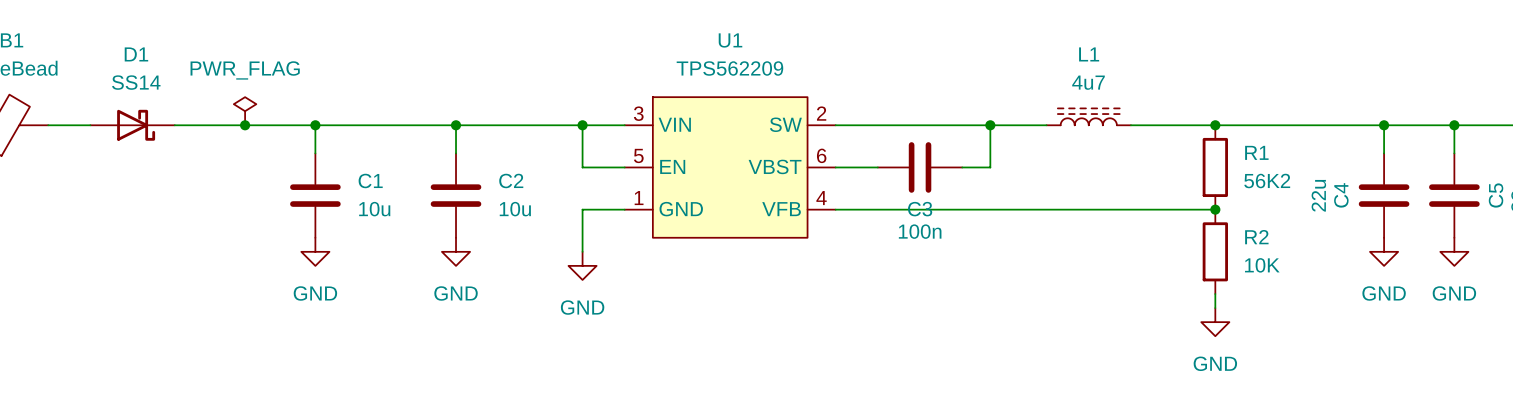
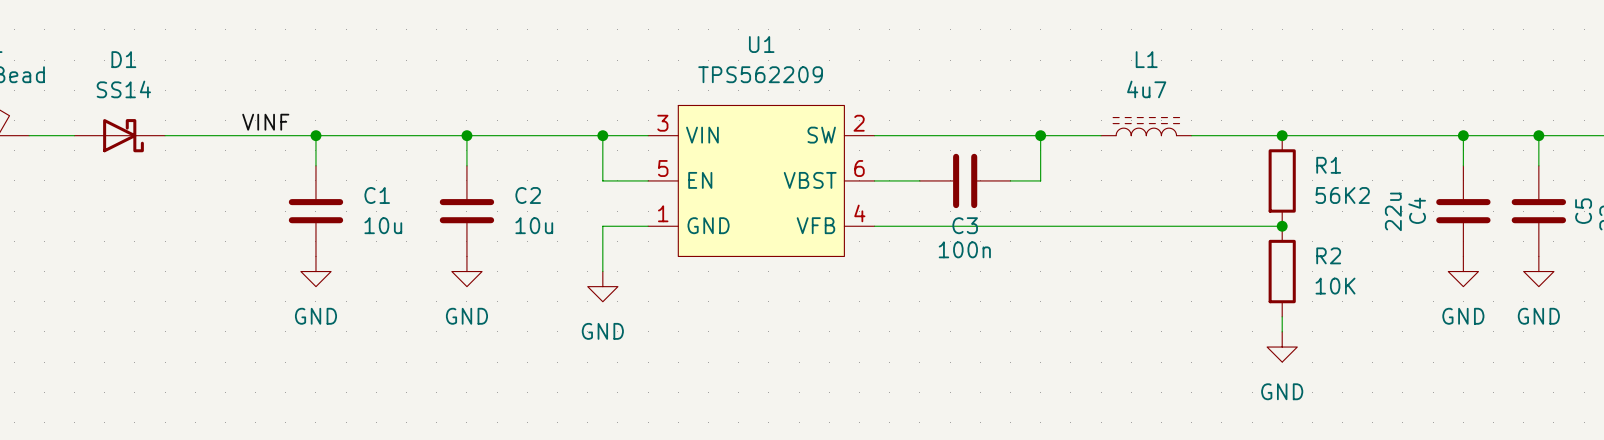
power symbol: PWR_FLAG (245, 111) -> none
label: none -> VINF (265, 122)
junction: (245, 125) -> none

